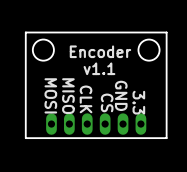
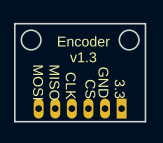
text: v1.1 (99, 68) -> v1.3 (83, 57)
part footprint: [46, 113, 147, 135] -> [33, 98, 127, 119]

